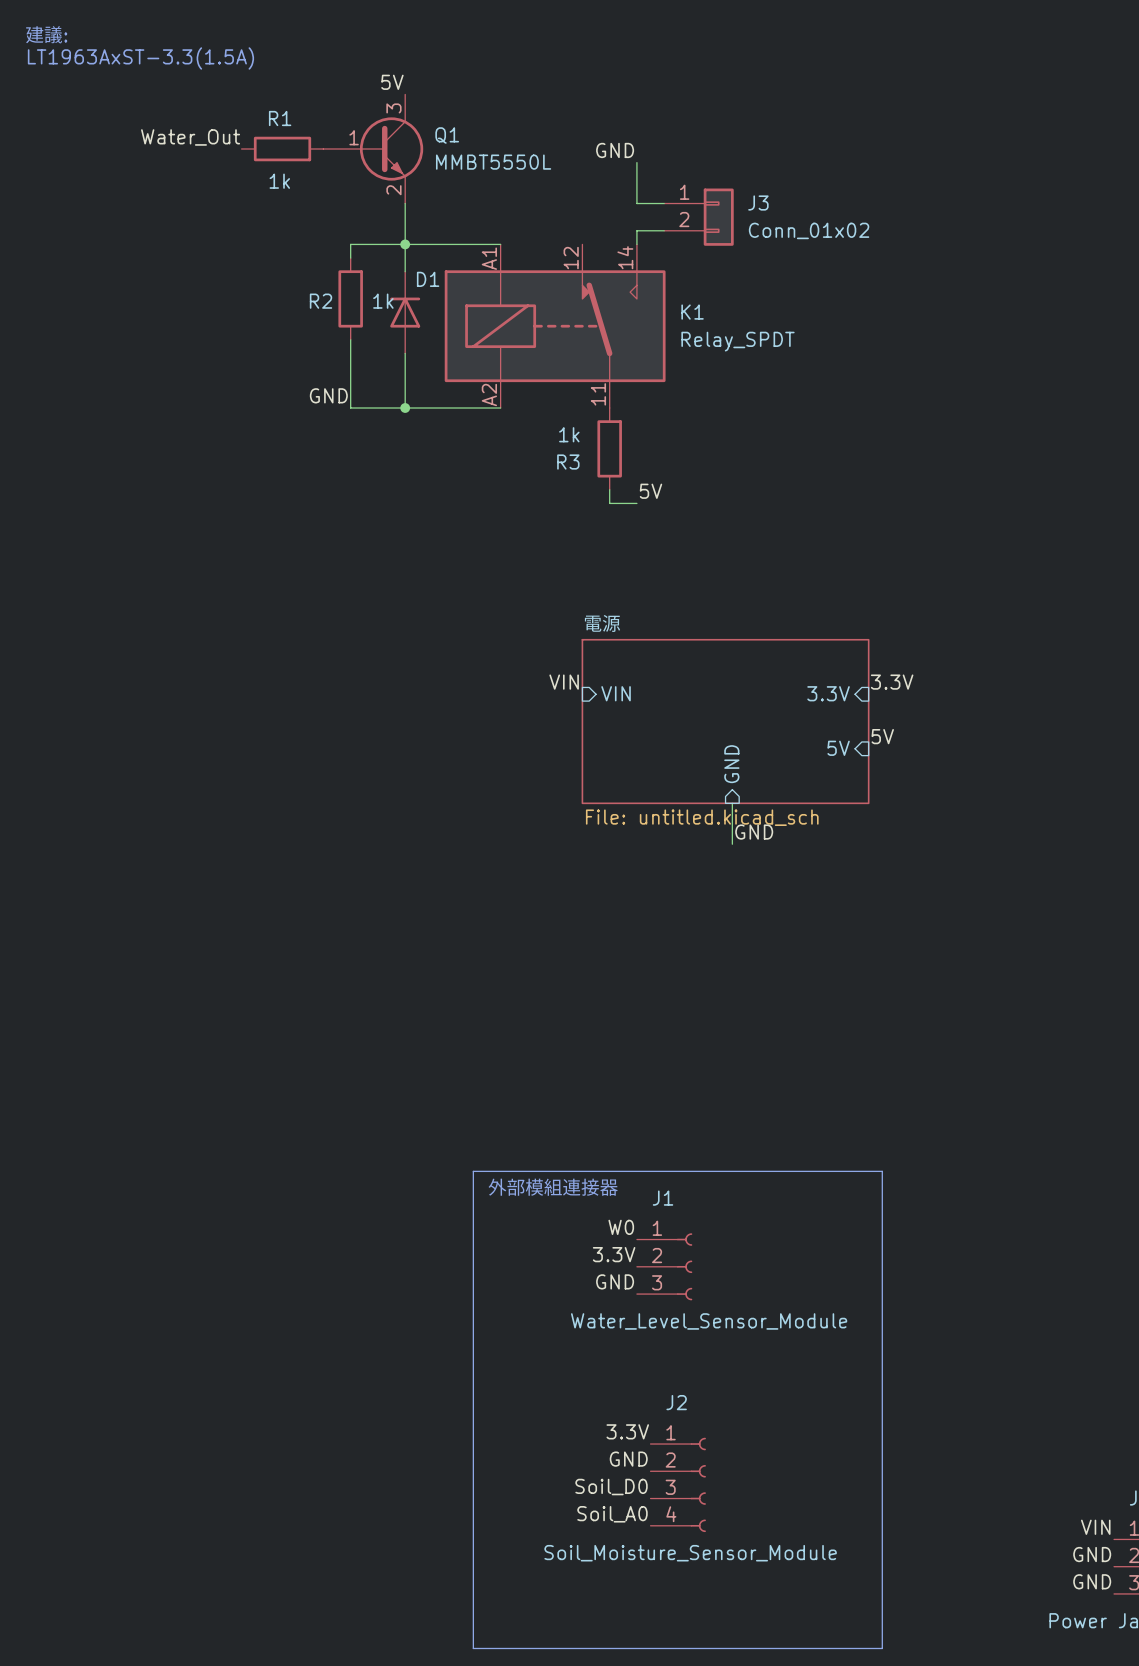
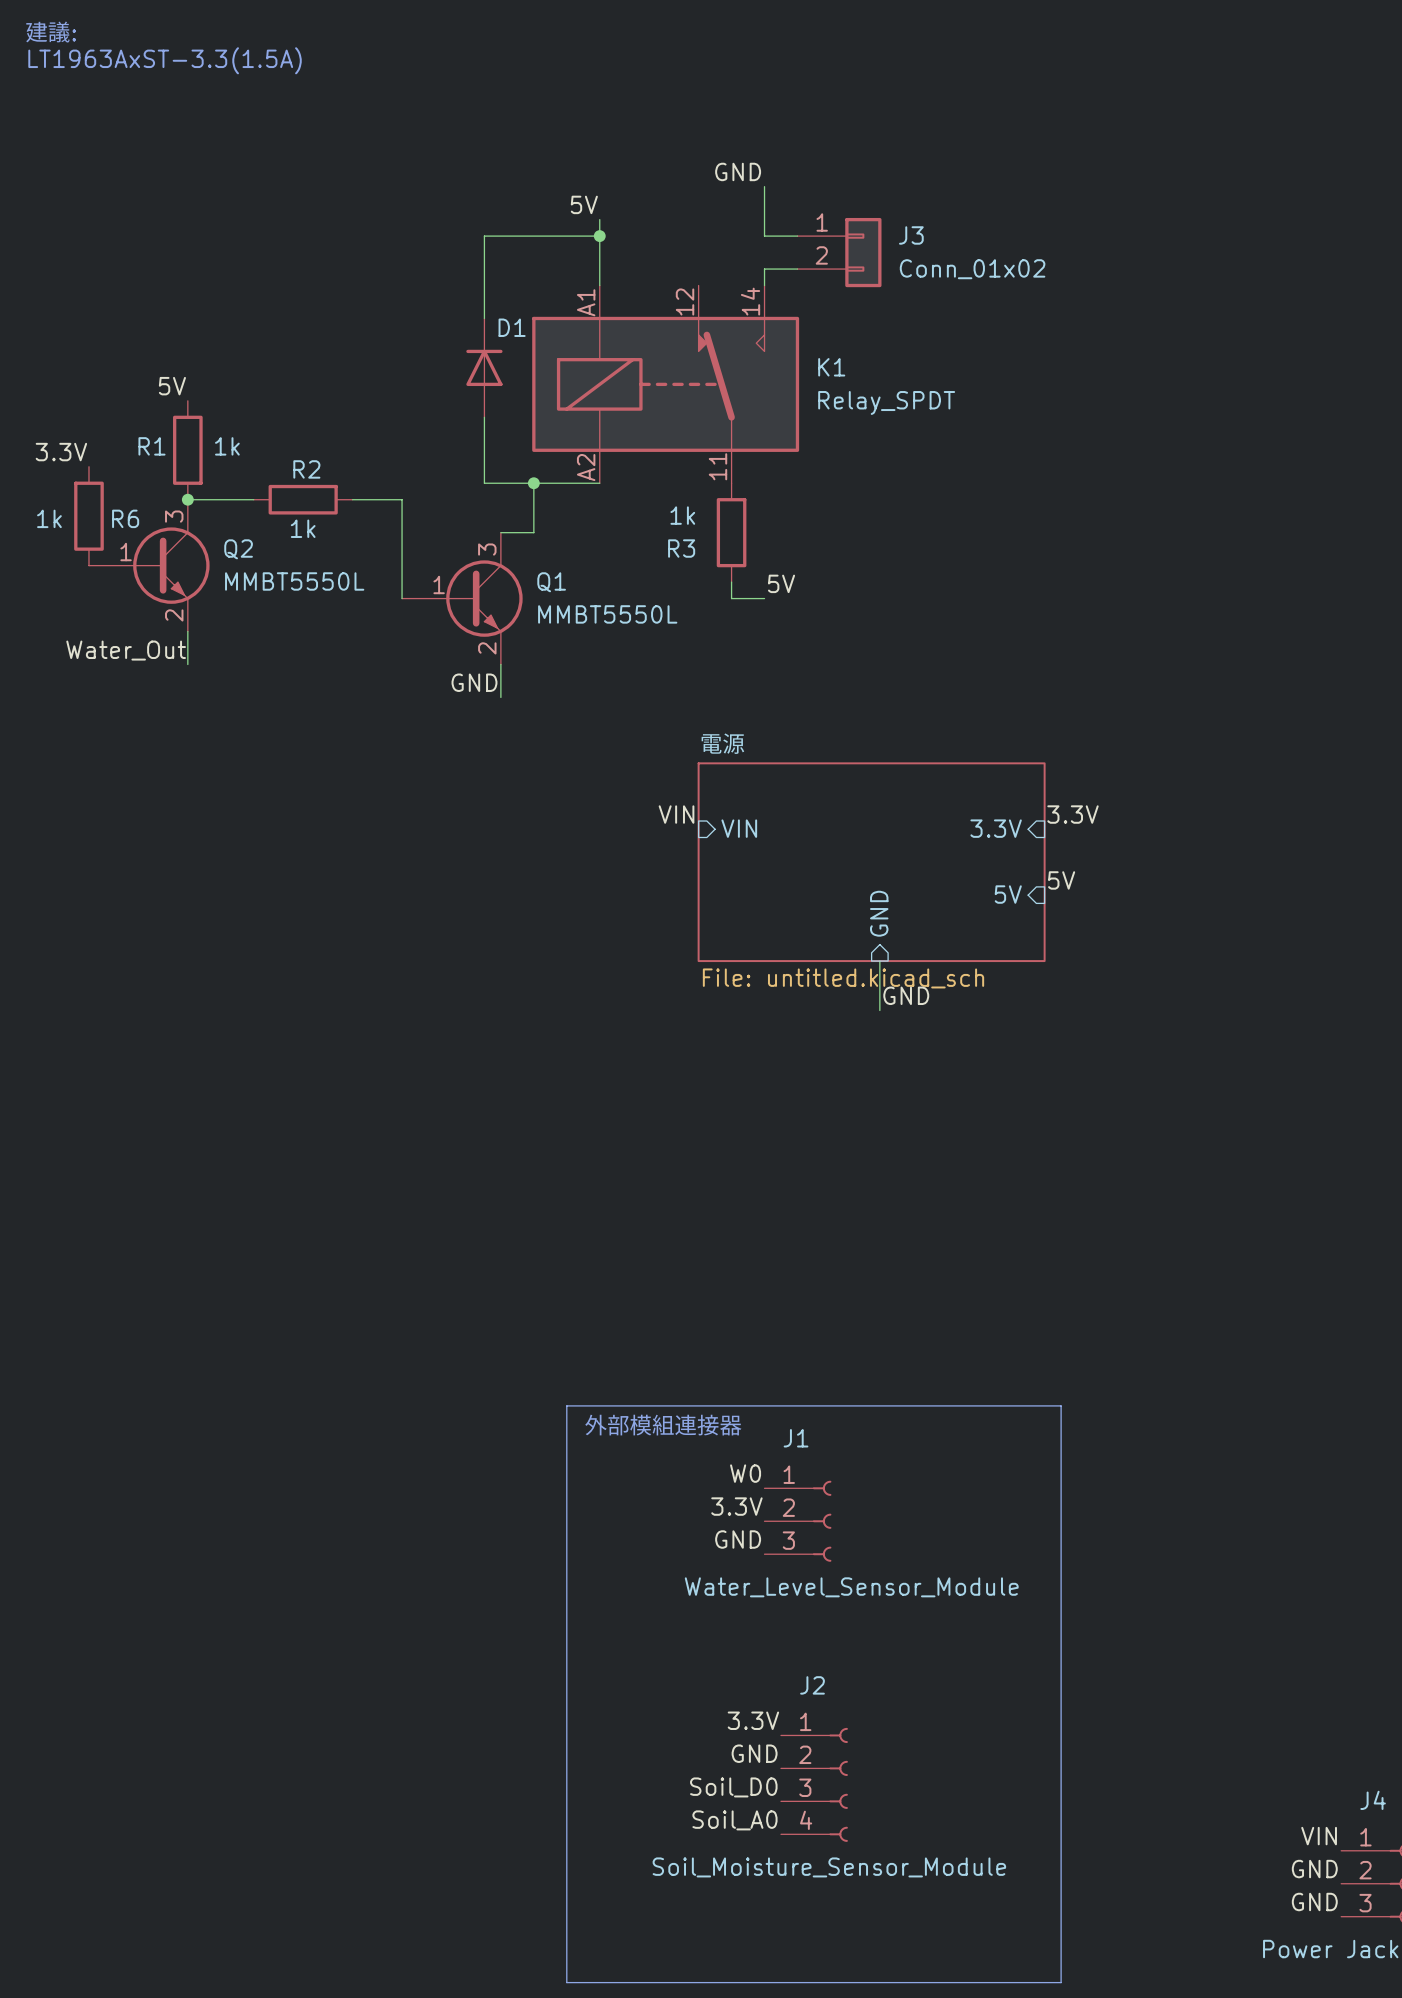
label position: 5V (392, 82) -> 5V (584, 204)
R1 name position: R1 (280, 118) -> R1 (151, 446)
label: Water_Out (190, 137) -> none
R1 rotation: 0° (282, 148) -> 90° clockwise (187, 450)
R1 position: (282, 148) -> (187, 450)
Q1 position: (373, 148) -> (462, 598)
R1 value position: 1k (279, 181) -> 1k (227, 446)
wire: none -> (484, 236) (599, 236)
junction: none -> (599, 236)
junction: (405, 244) -> none
wire: (500, 244) (350, 244) (350, 258) -> (599, 285) (599, 219)
R2 rotation: 0° (350, 298) -> 90° clockwise (303, 499)
R2 position: (350, 298) -> (303, 499)
label: none -> 5V (172, 386)
wire: (350, 339) (350, 408) (405, 408) -> none
label: none -> 3.3V (61, 452)
label position: GND (328, 395) -> GND (474, 682)
junction position: (405, 408) -> (533, 483)
wire: none -> (533, 483) (533, 532) (500, 532)
wire: none -> (187, 499) (253, 499)
junction: none -> (187, 499)
wire: none -> (352, 499) (402, 499) (402, 598)
R6: none -> 1k (88, 516)
Q2: none -> MMBT5550L (149, 565)
wire: none -> (187, 631) (187, 664)
label: none -> Water_Out (126, 650)
wire: none -> (500, 664) (500, 697)

